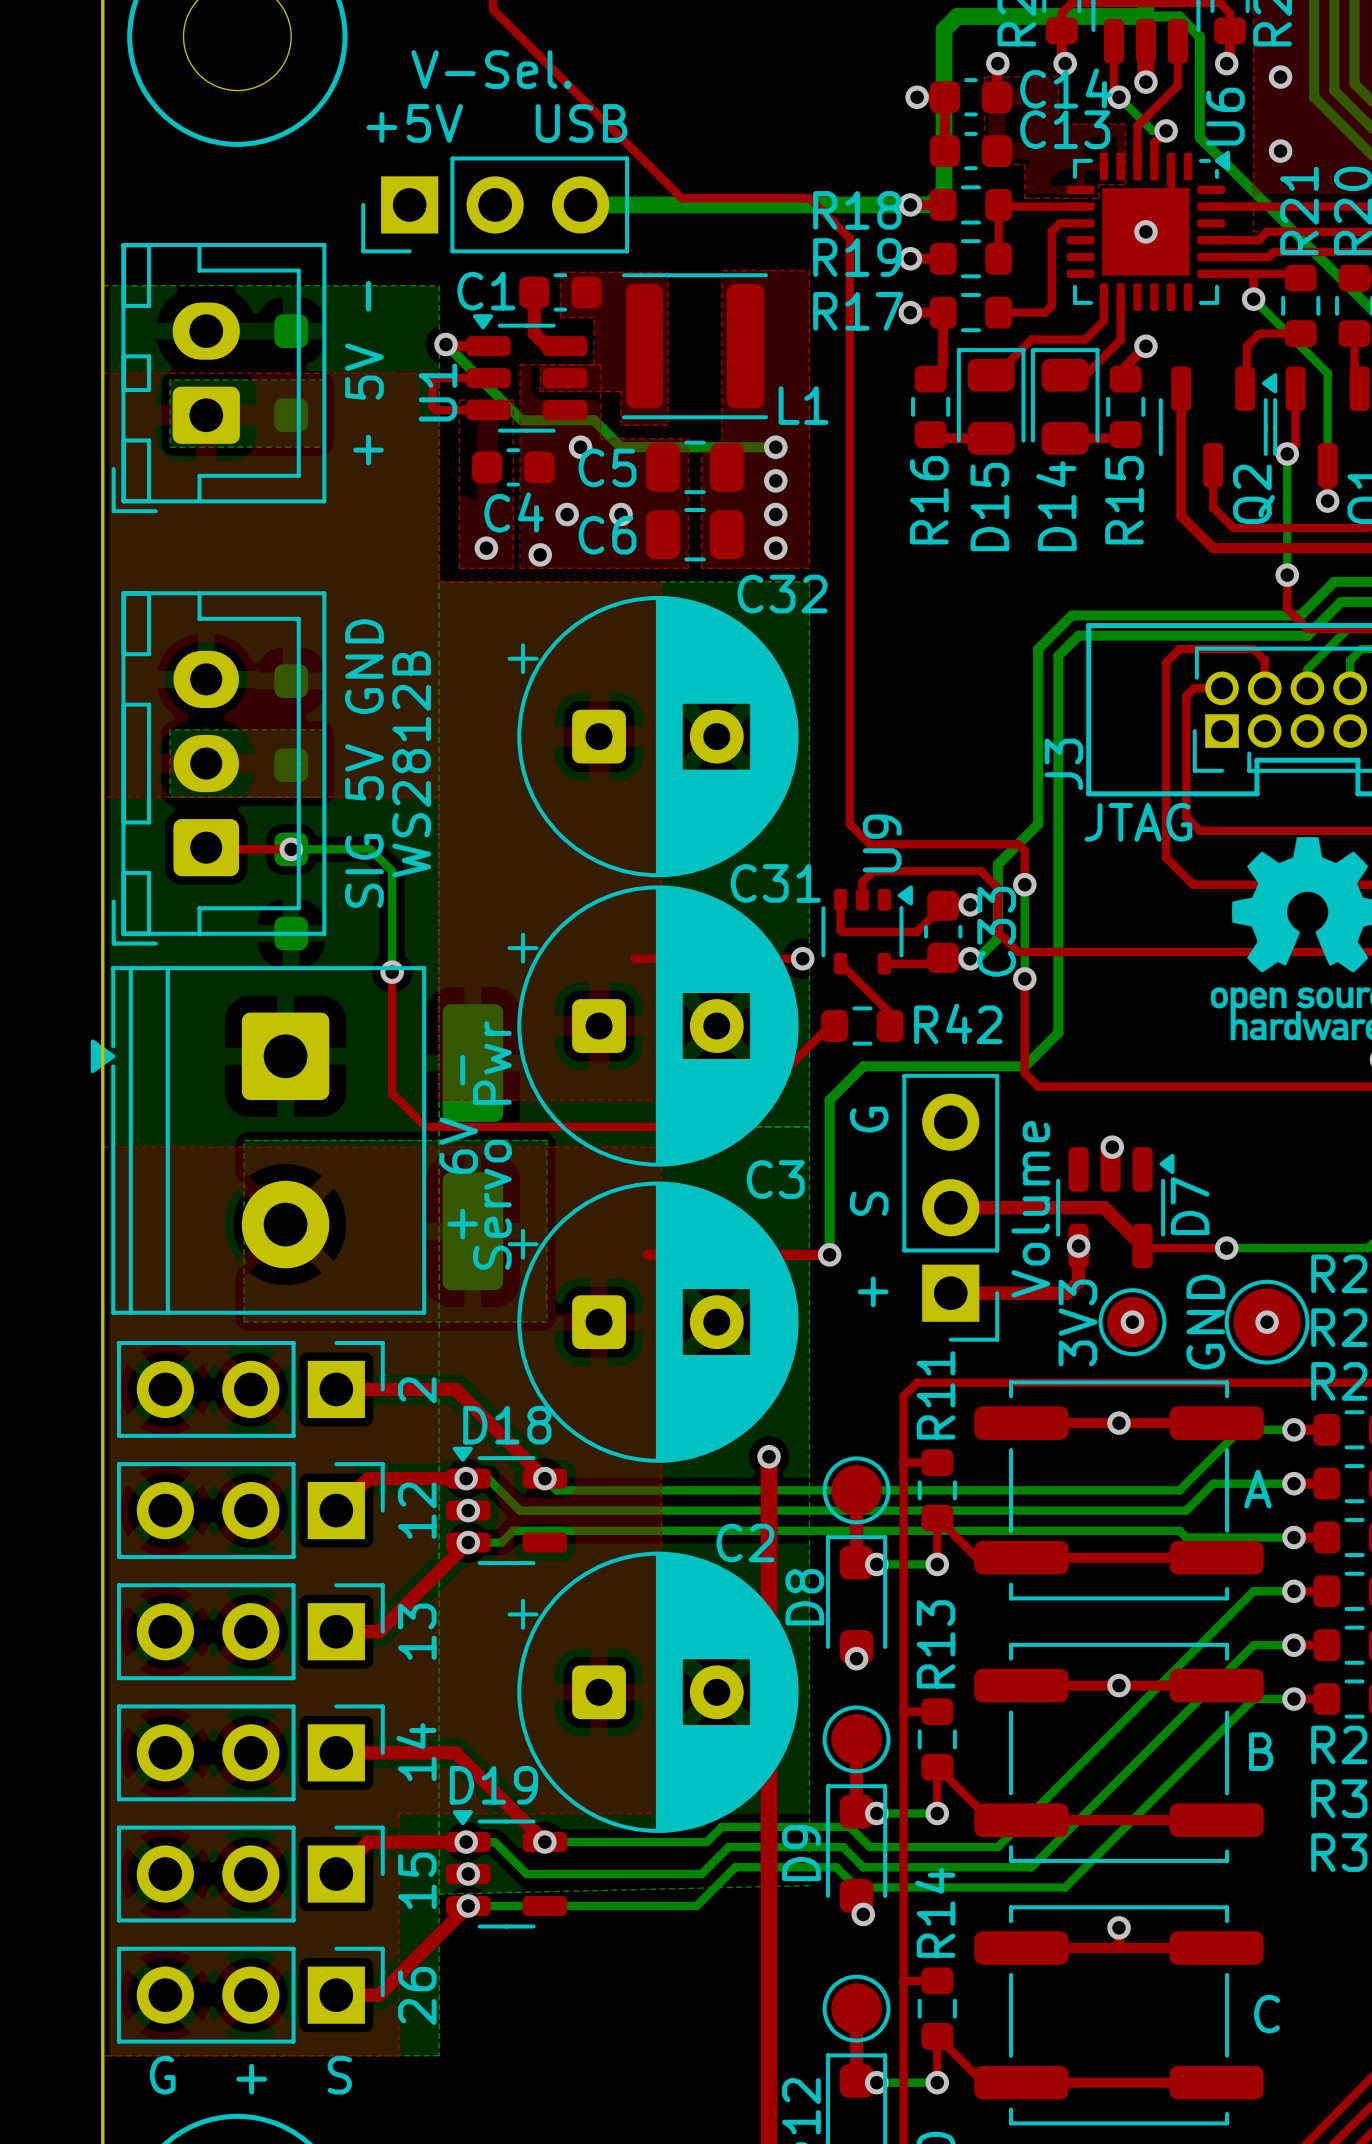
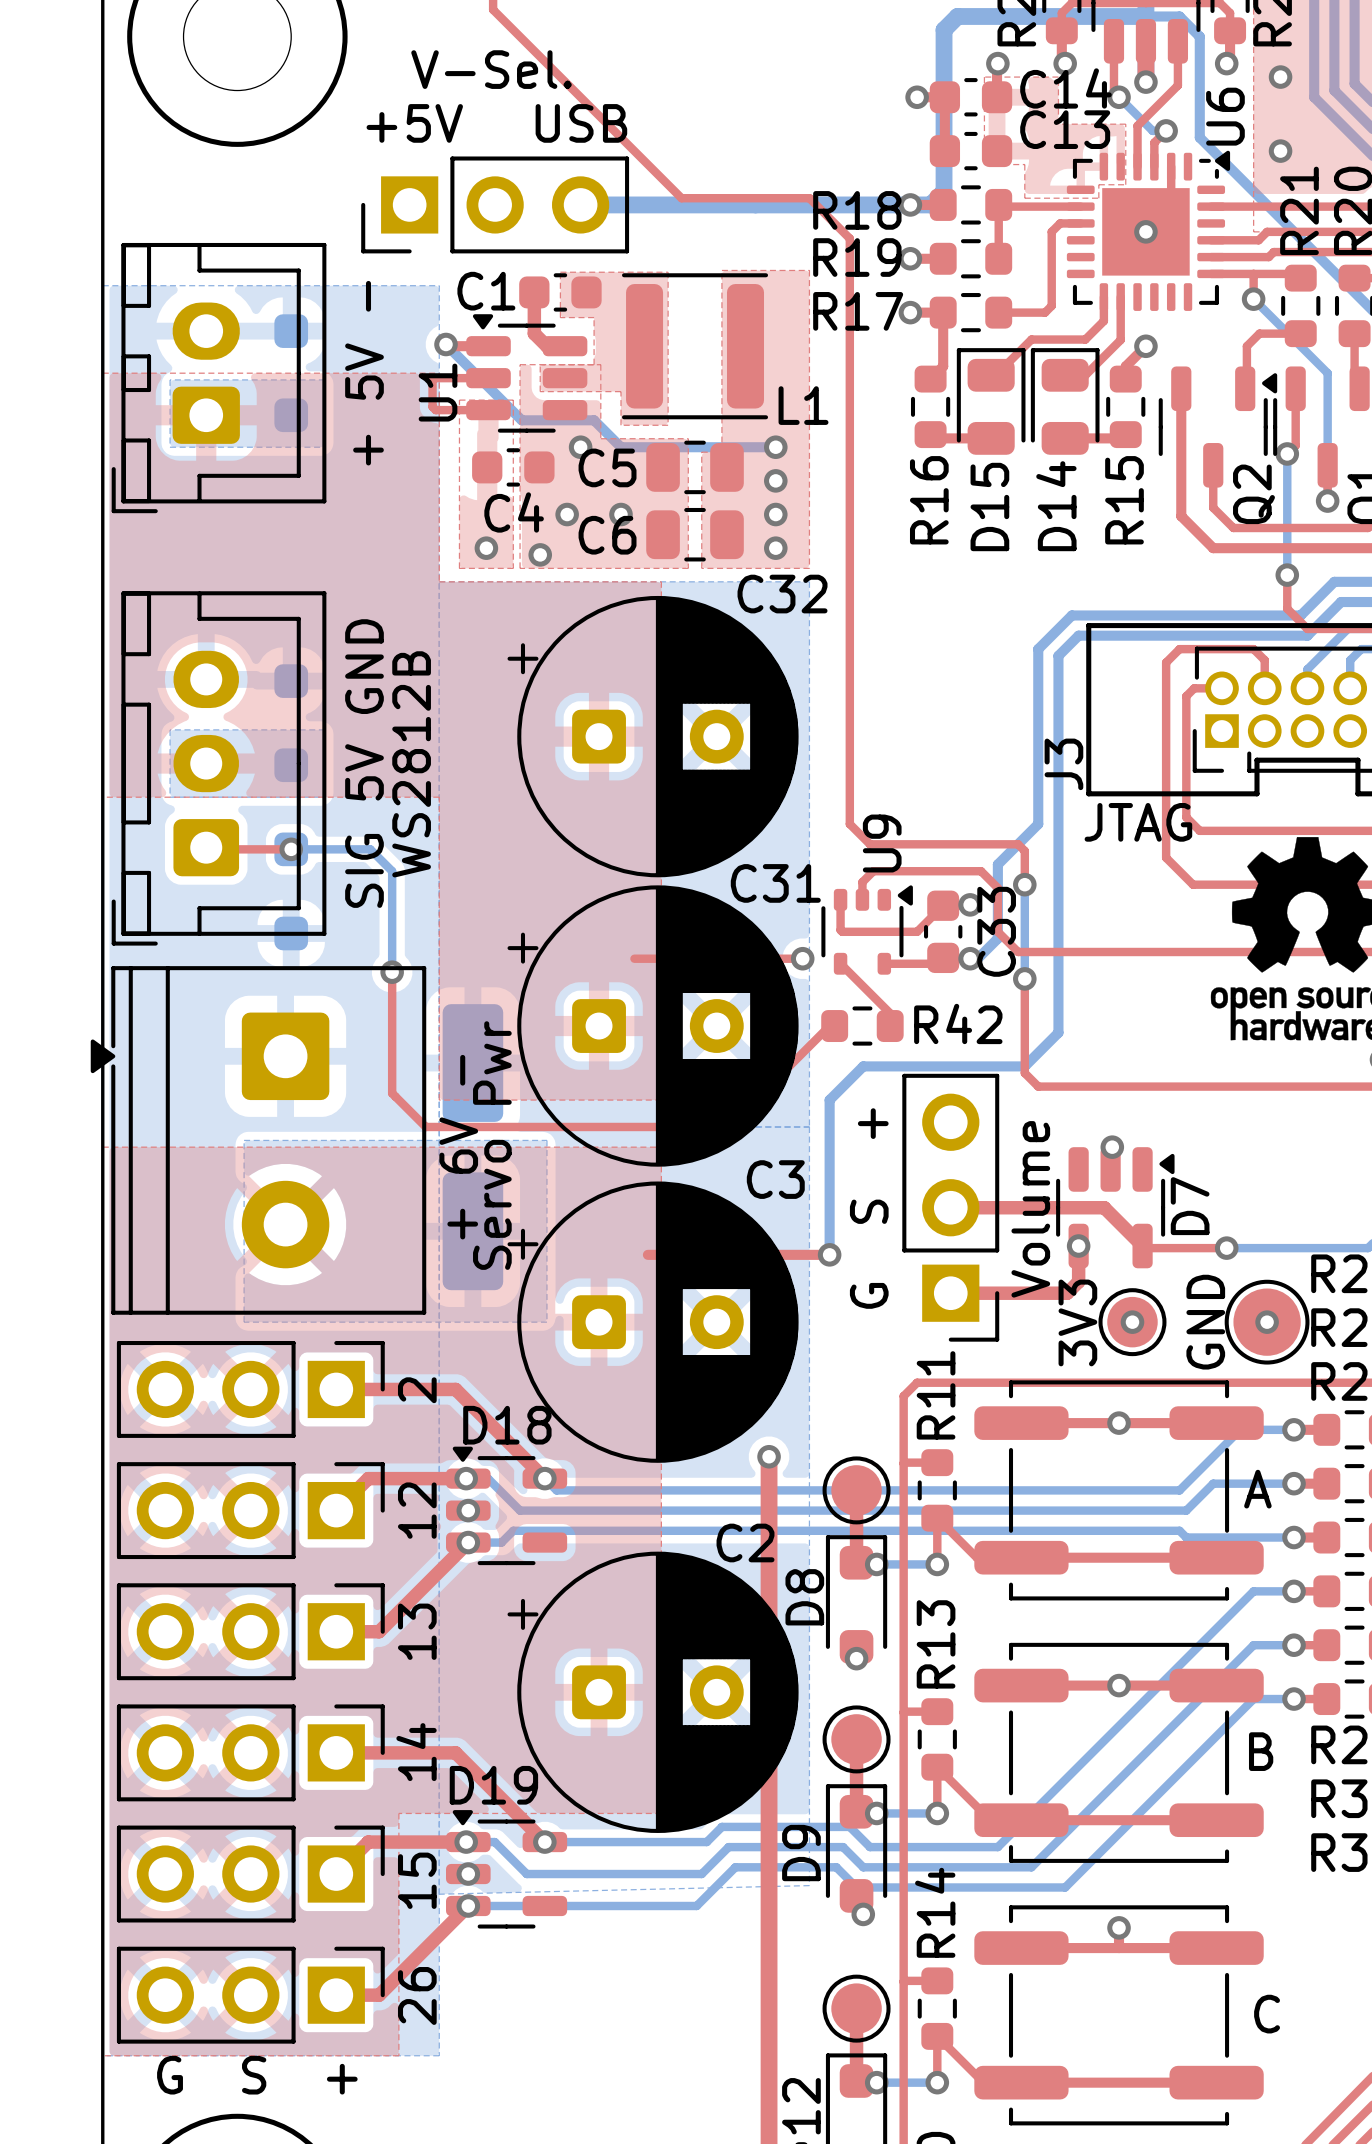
text: + S G (869, 1206) -> G S + (869, 1208)
text: G + S (250, 2075) -> G S + (257, 2075)

